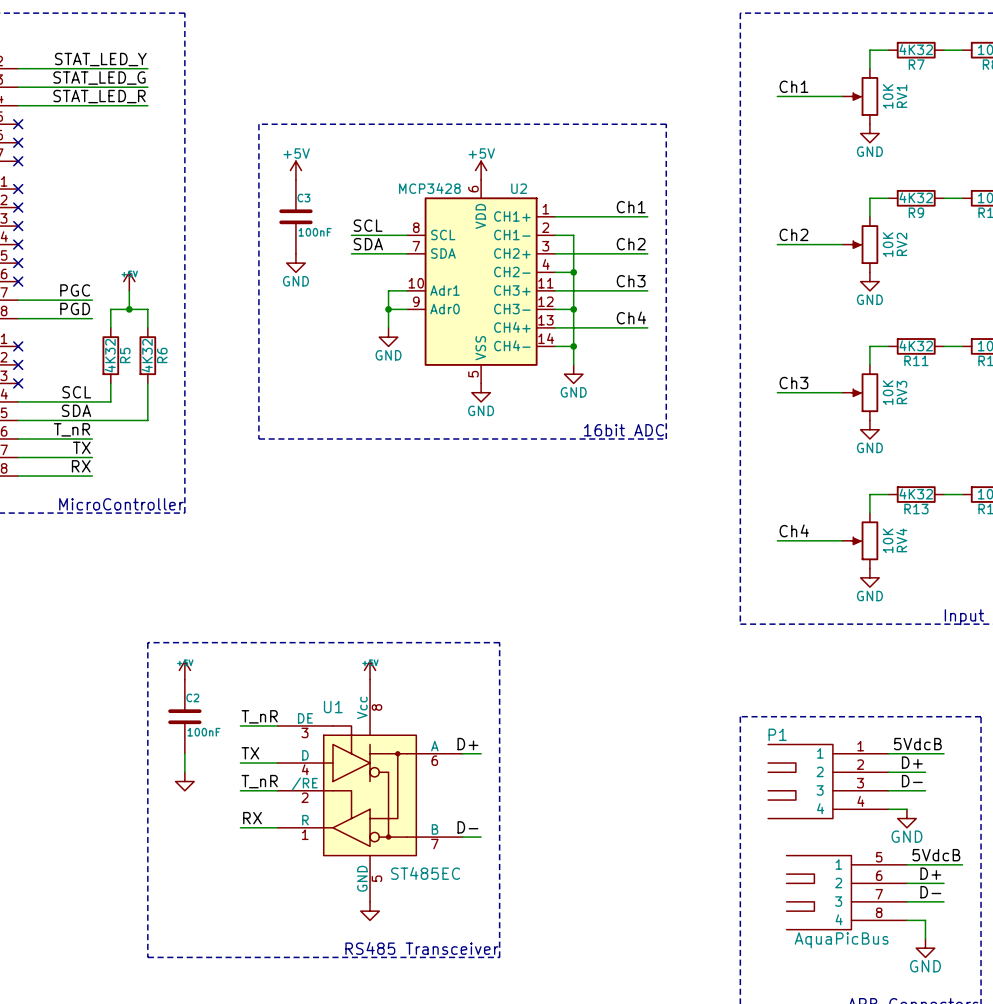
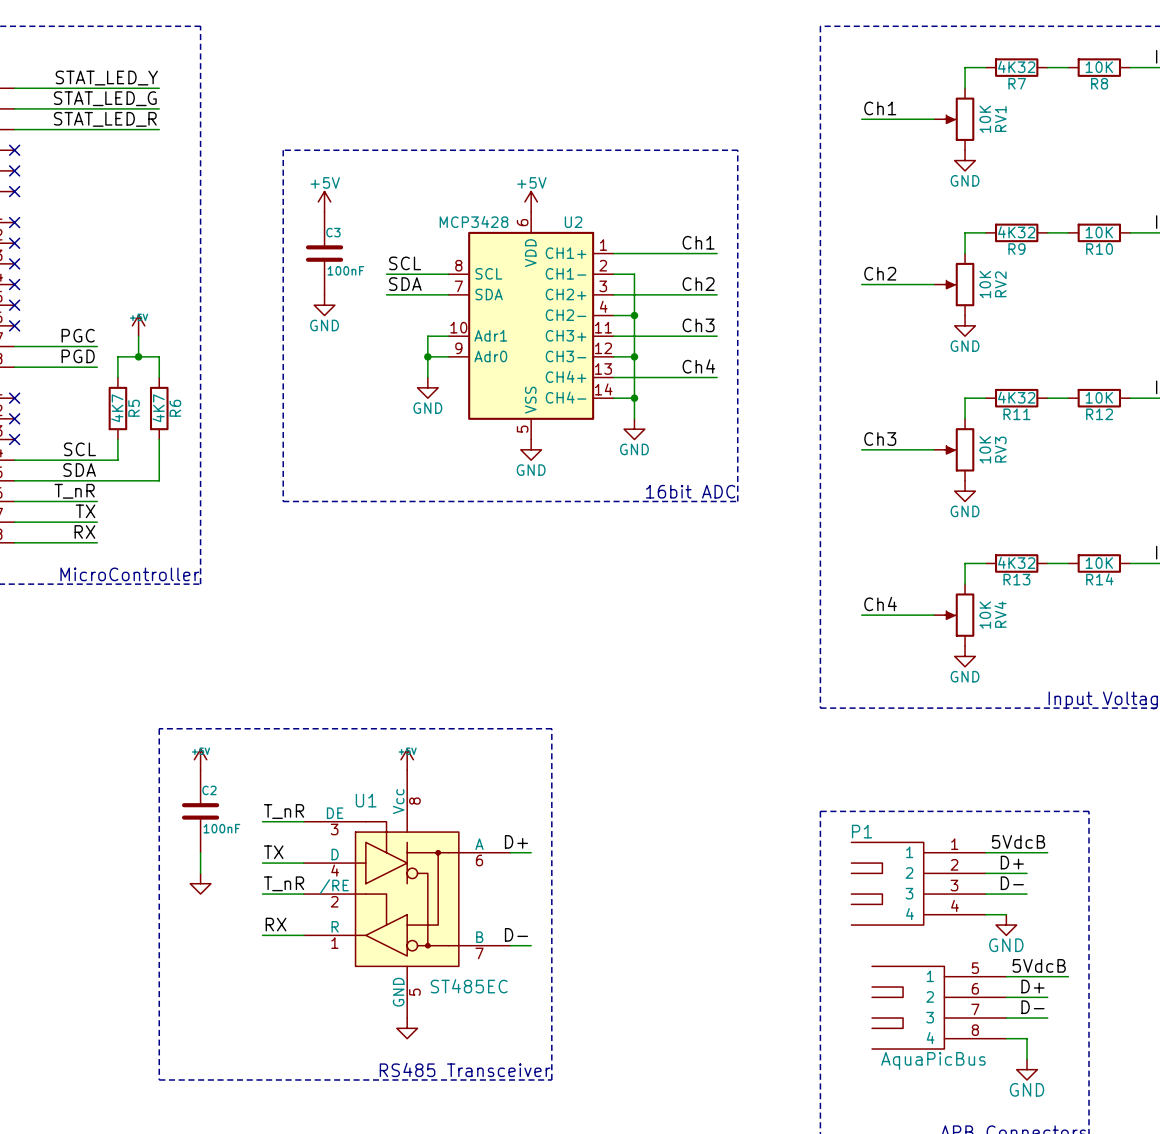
R5 value: 4K32 (110, 355) -> 4K7 (117, 408)
R6 value: 4K32 (147, 355) -> 4K7 (158, 408)

